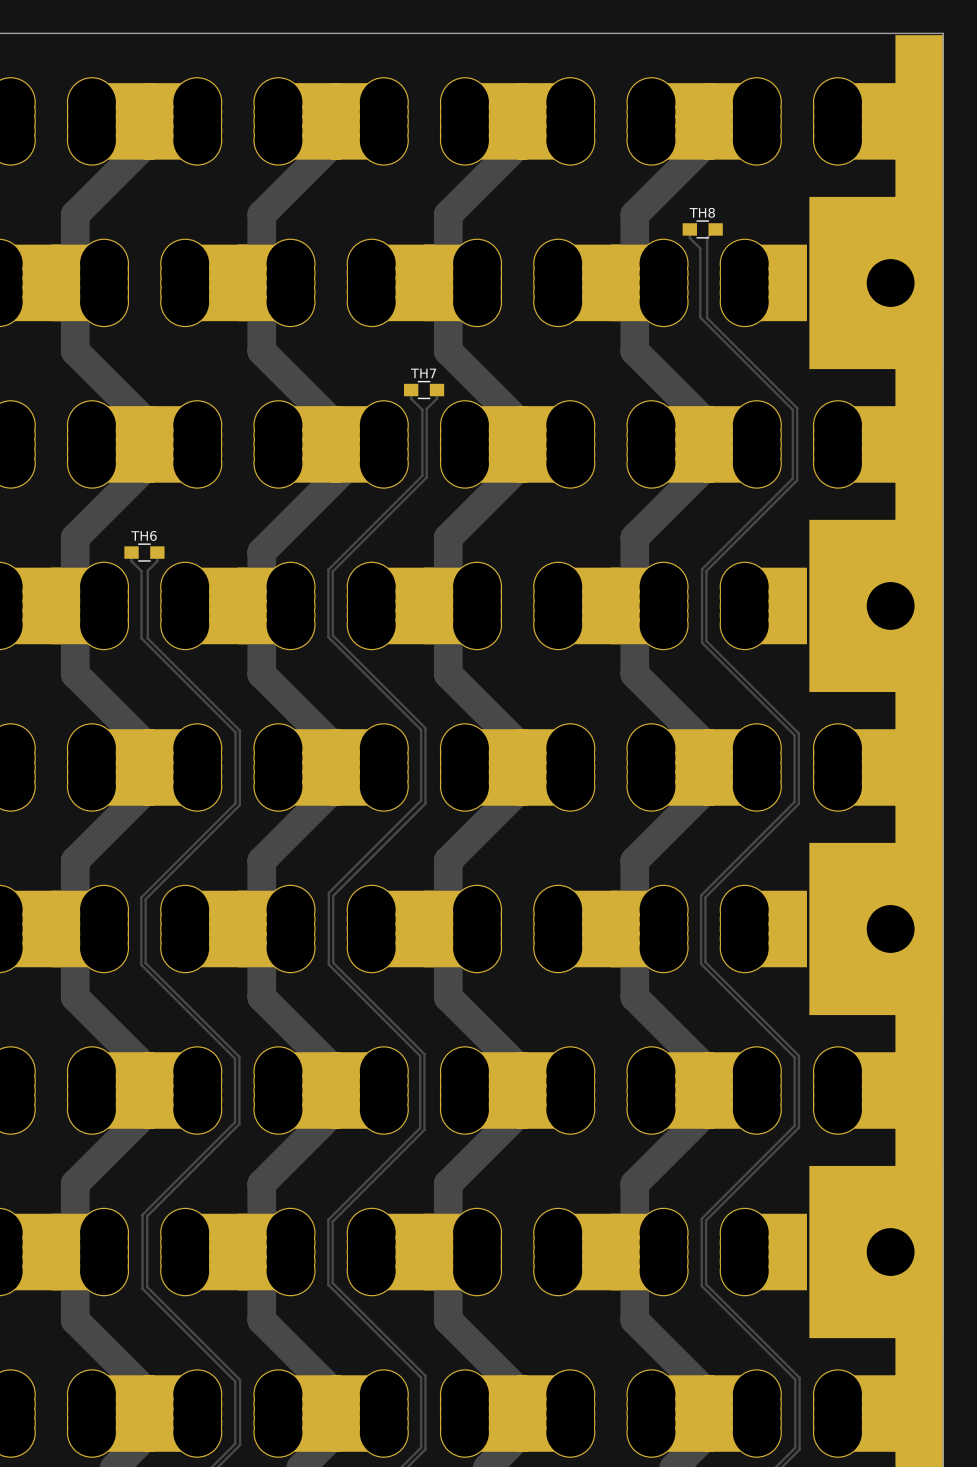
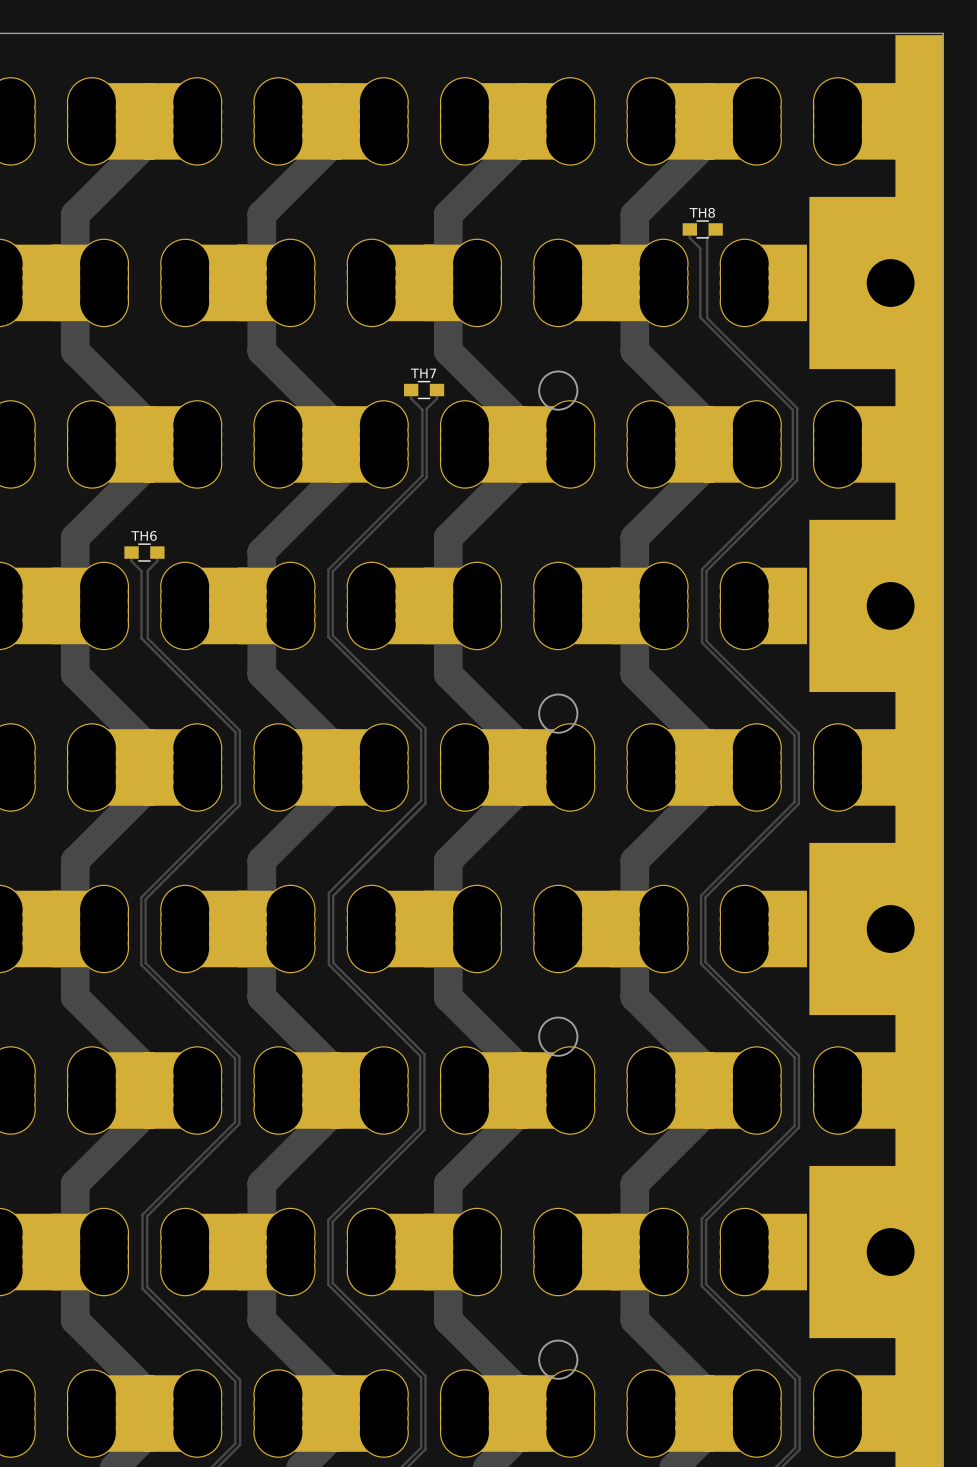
round board edge: none -> [538, 370, 579, 411]
round board edge: none -> [538, 693, 579, 734]
round board edge: none -> [538, 1016, 579, 1057]
round board edge: none -> [538, 1339, 579, 1380]

